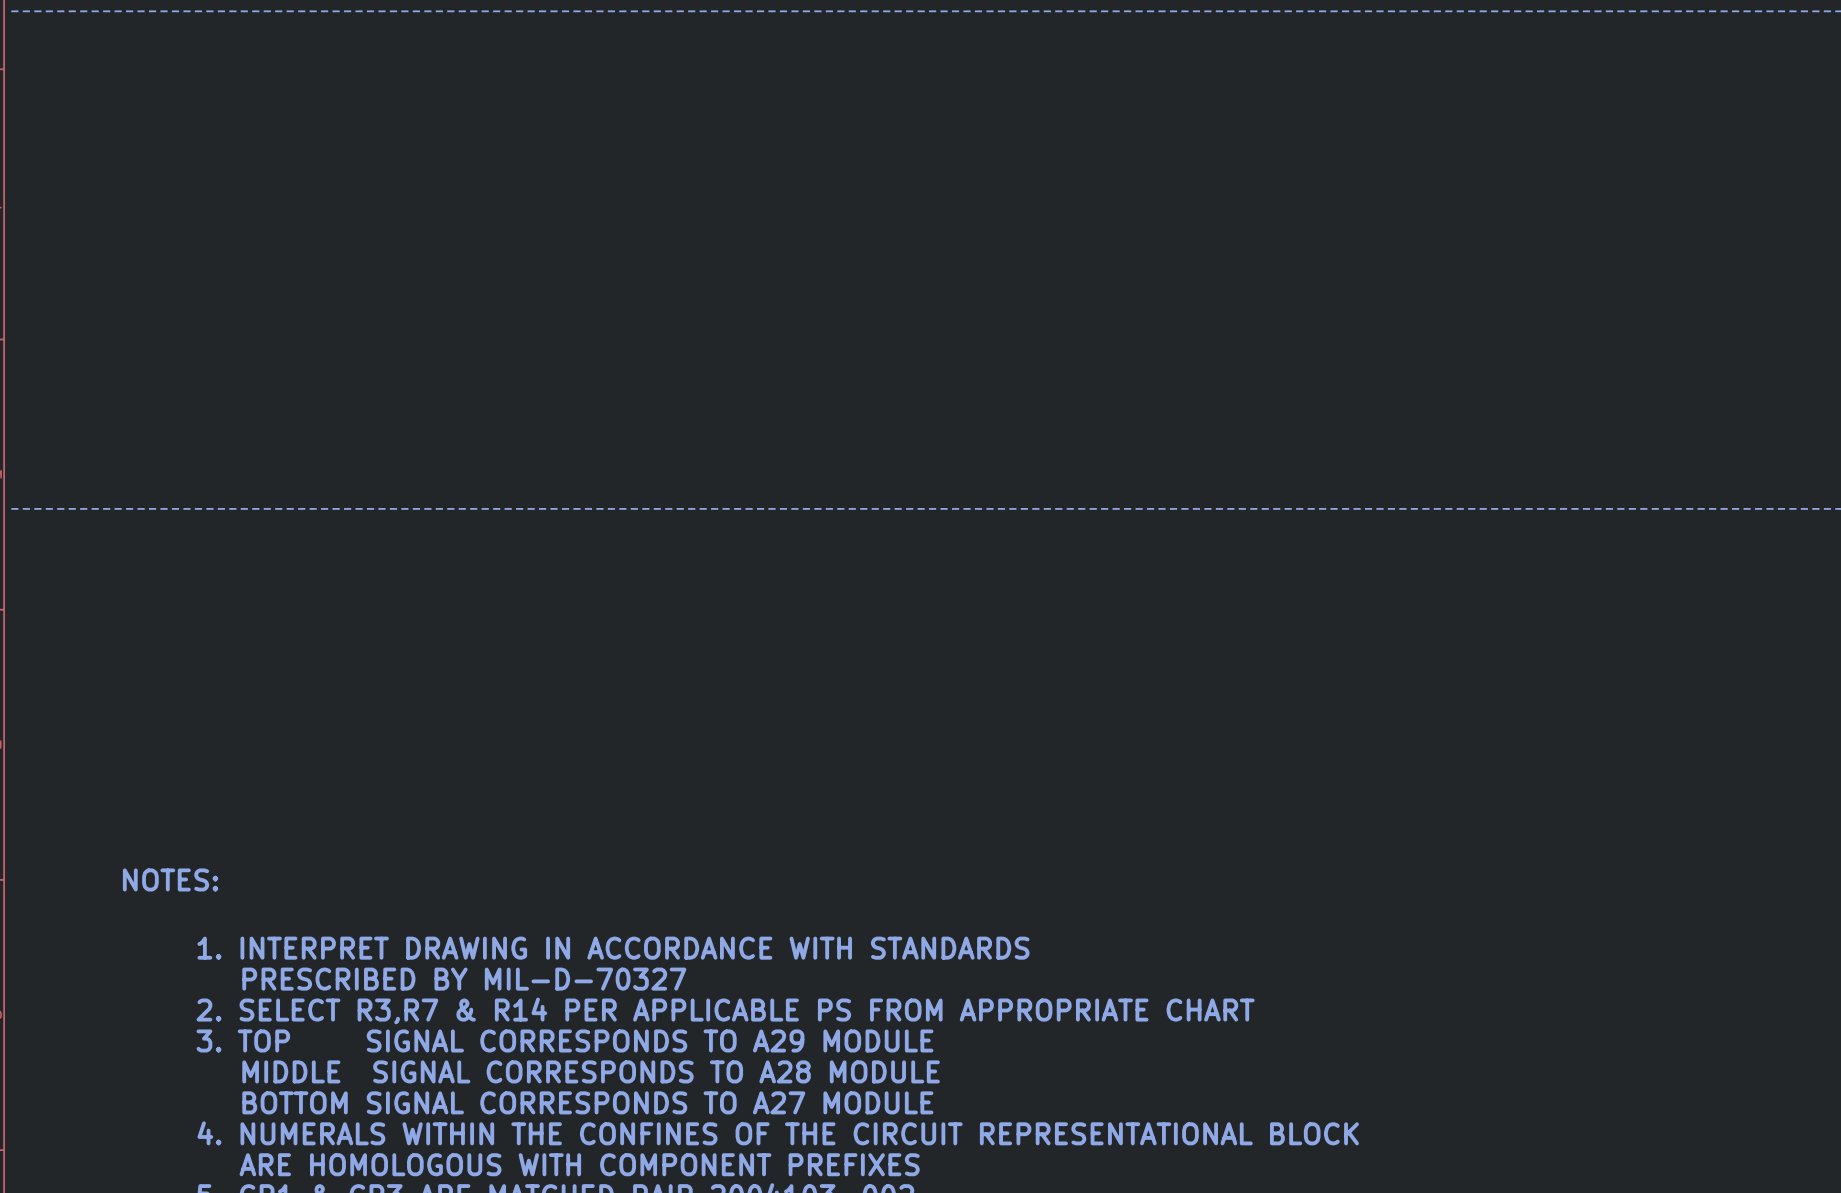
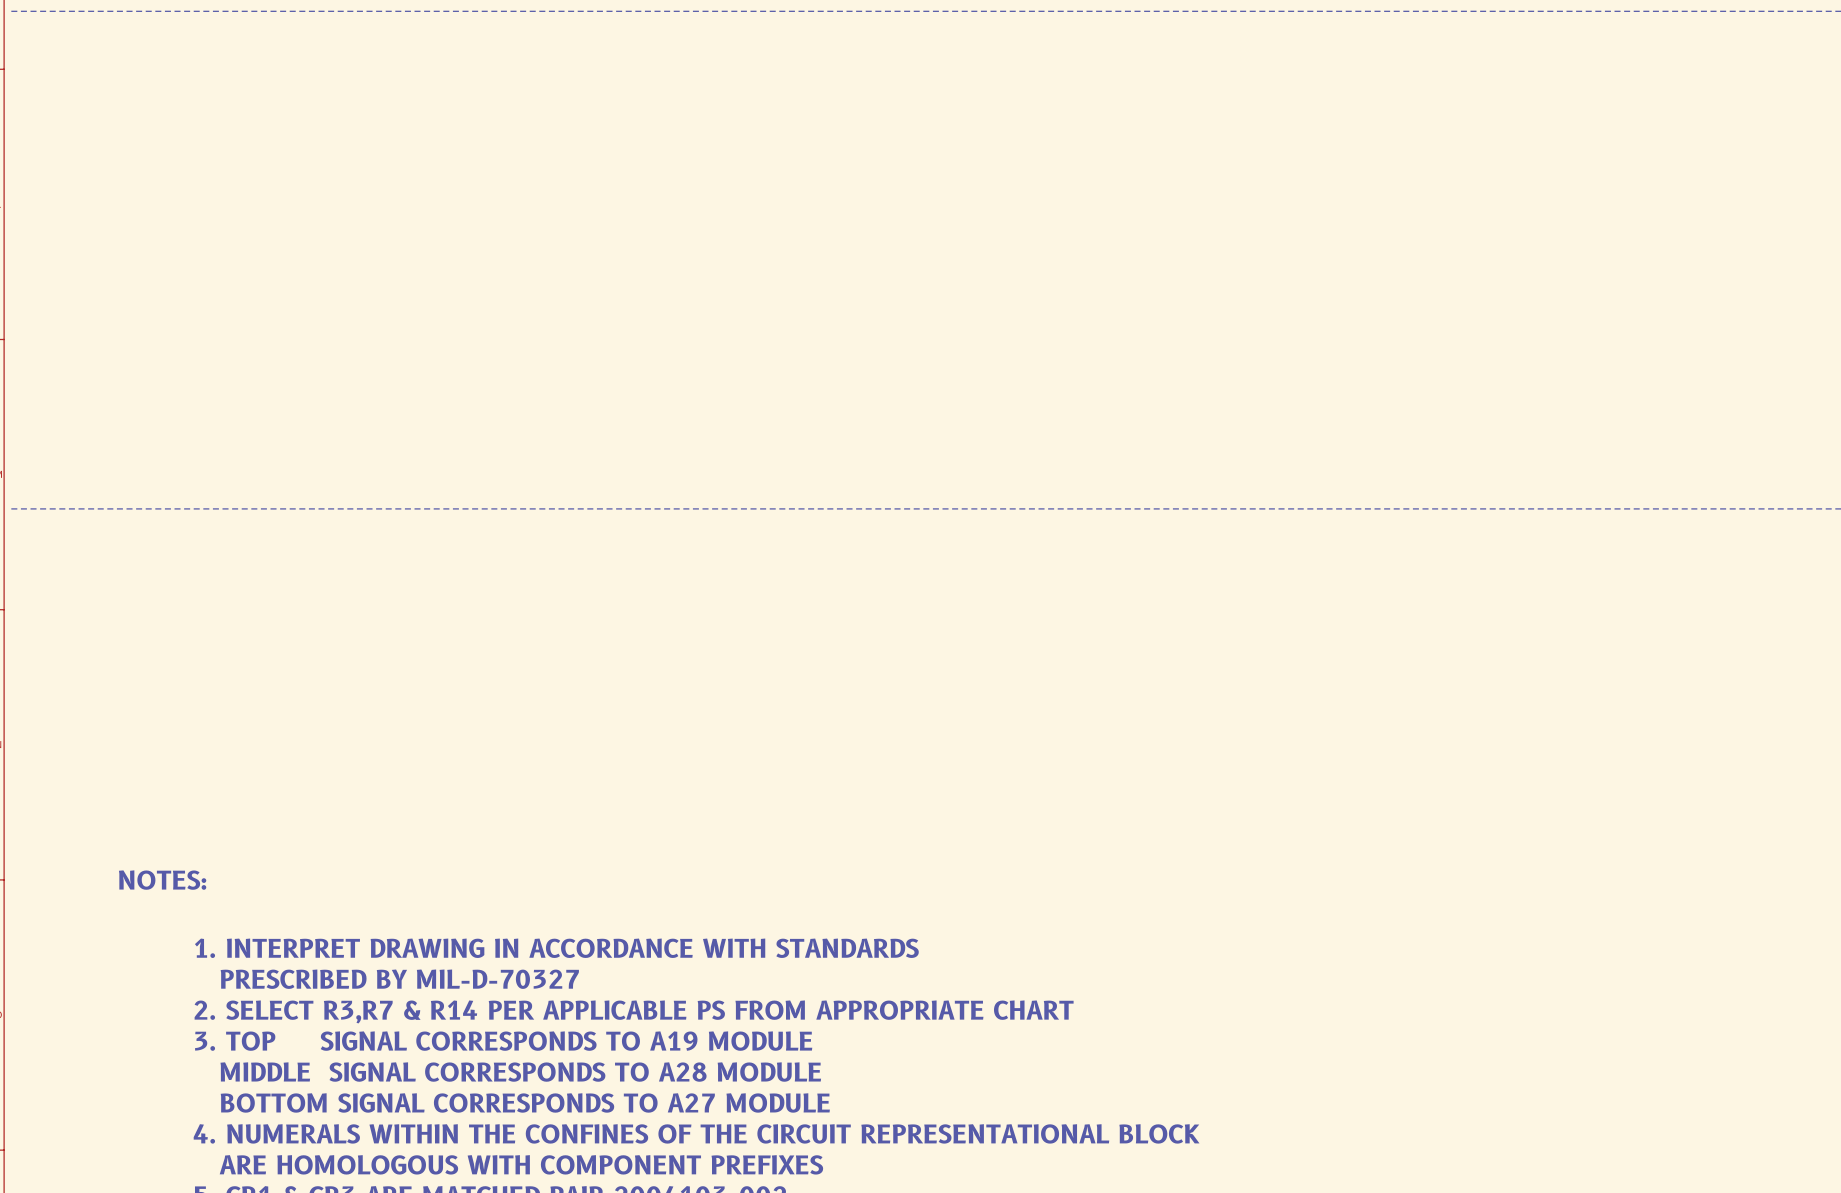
text: 3. TOP SIGNAL CORRESPONDS TO A29 MODULE (564, 1040) -> 3. TOP SIGNAL CORRESPONDS TO A19 MODULE (503, 1041)

